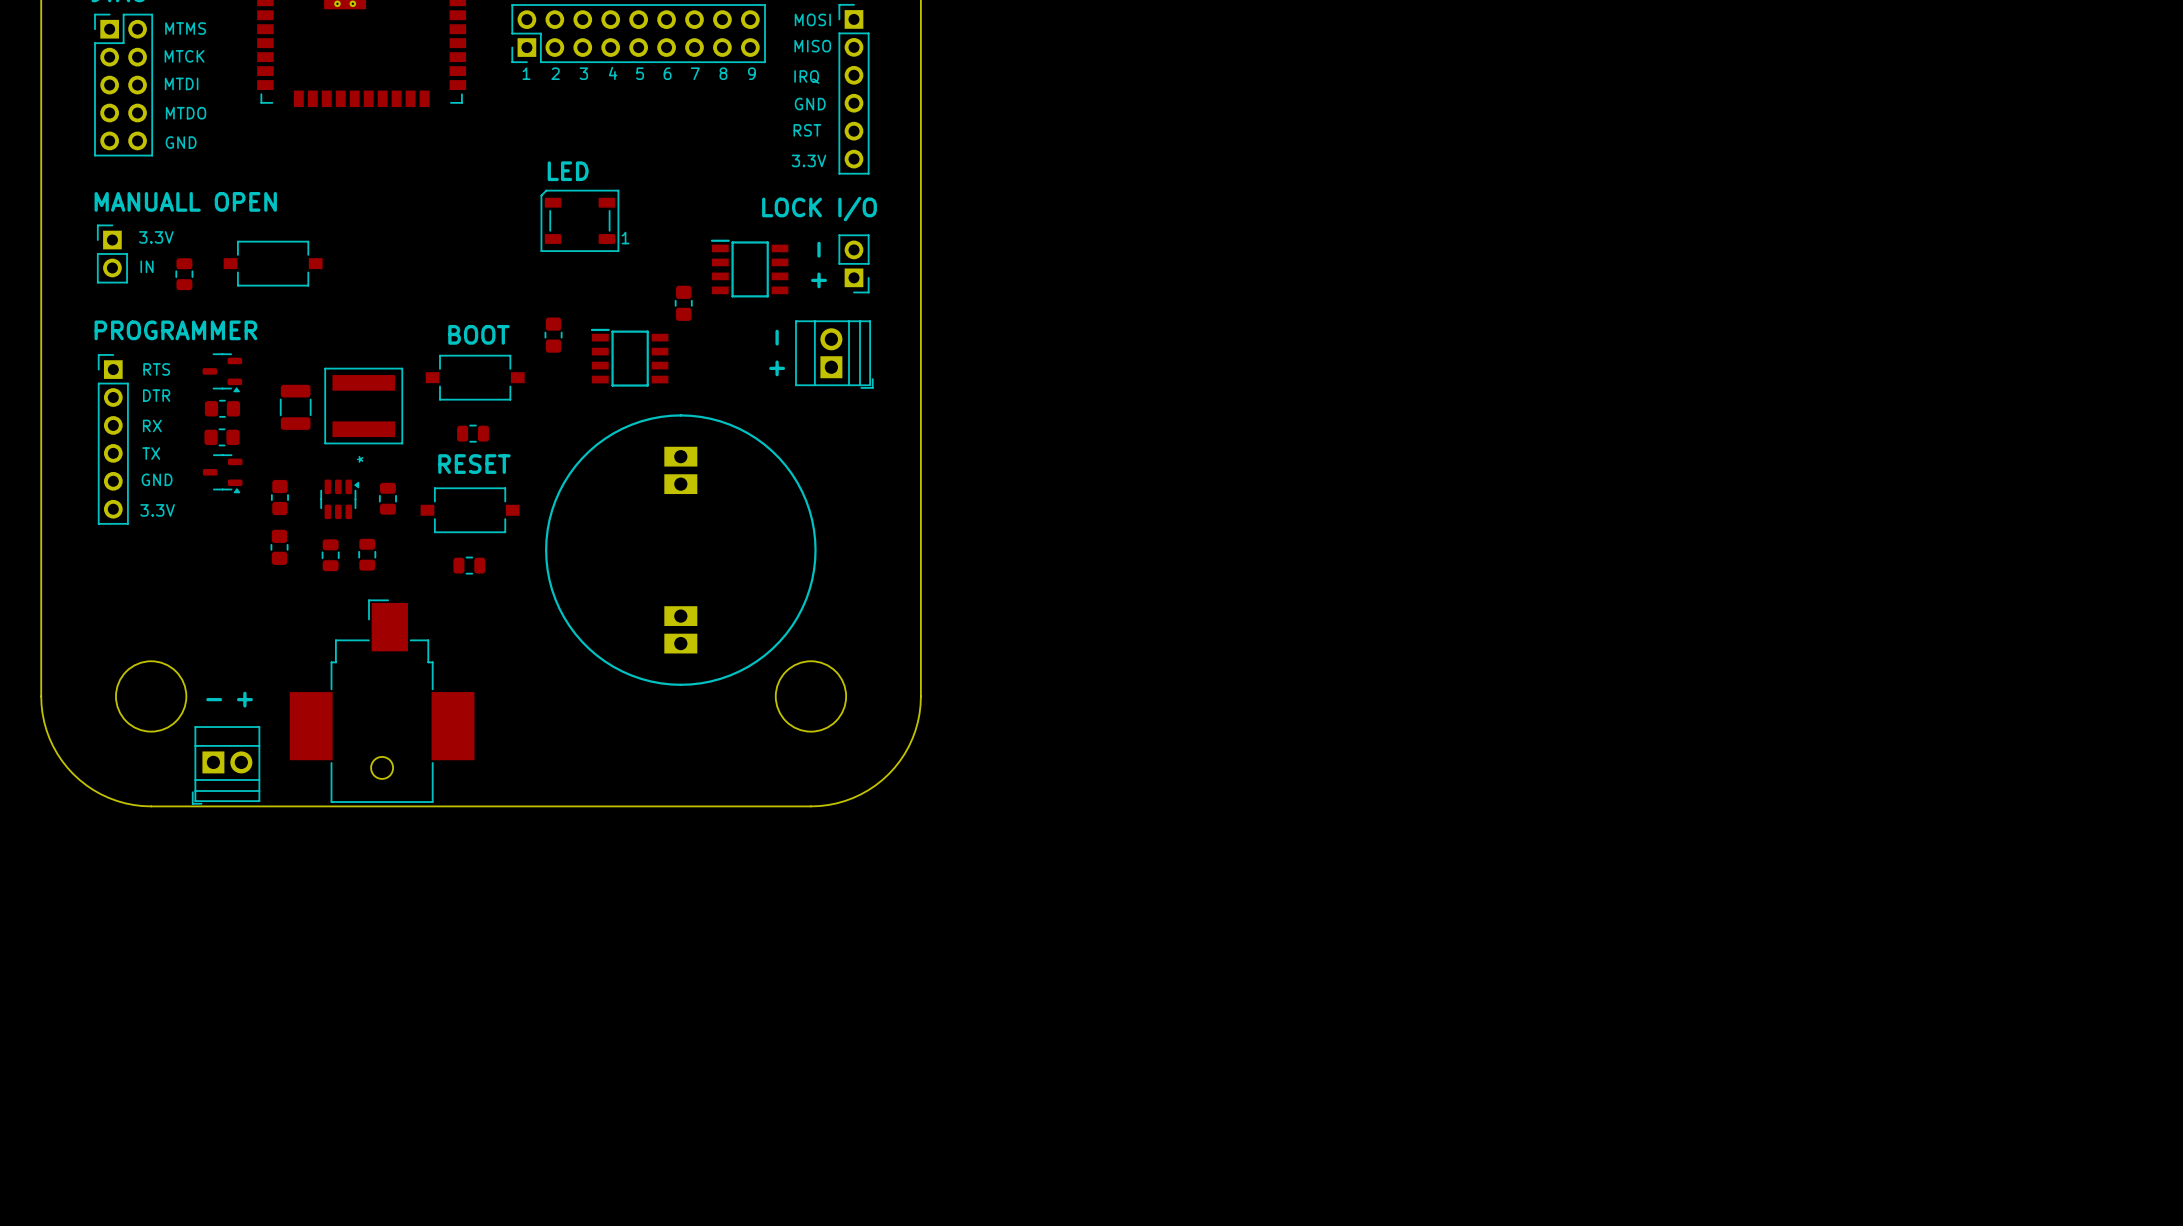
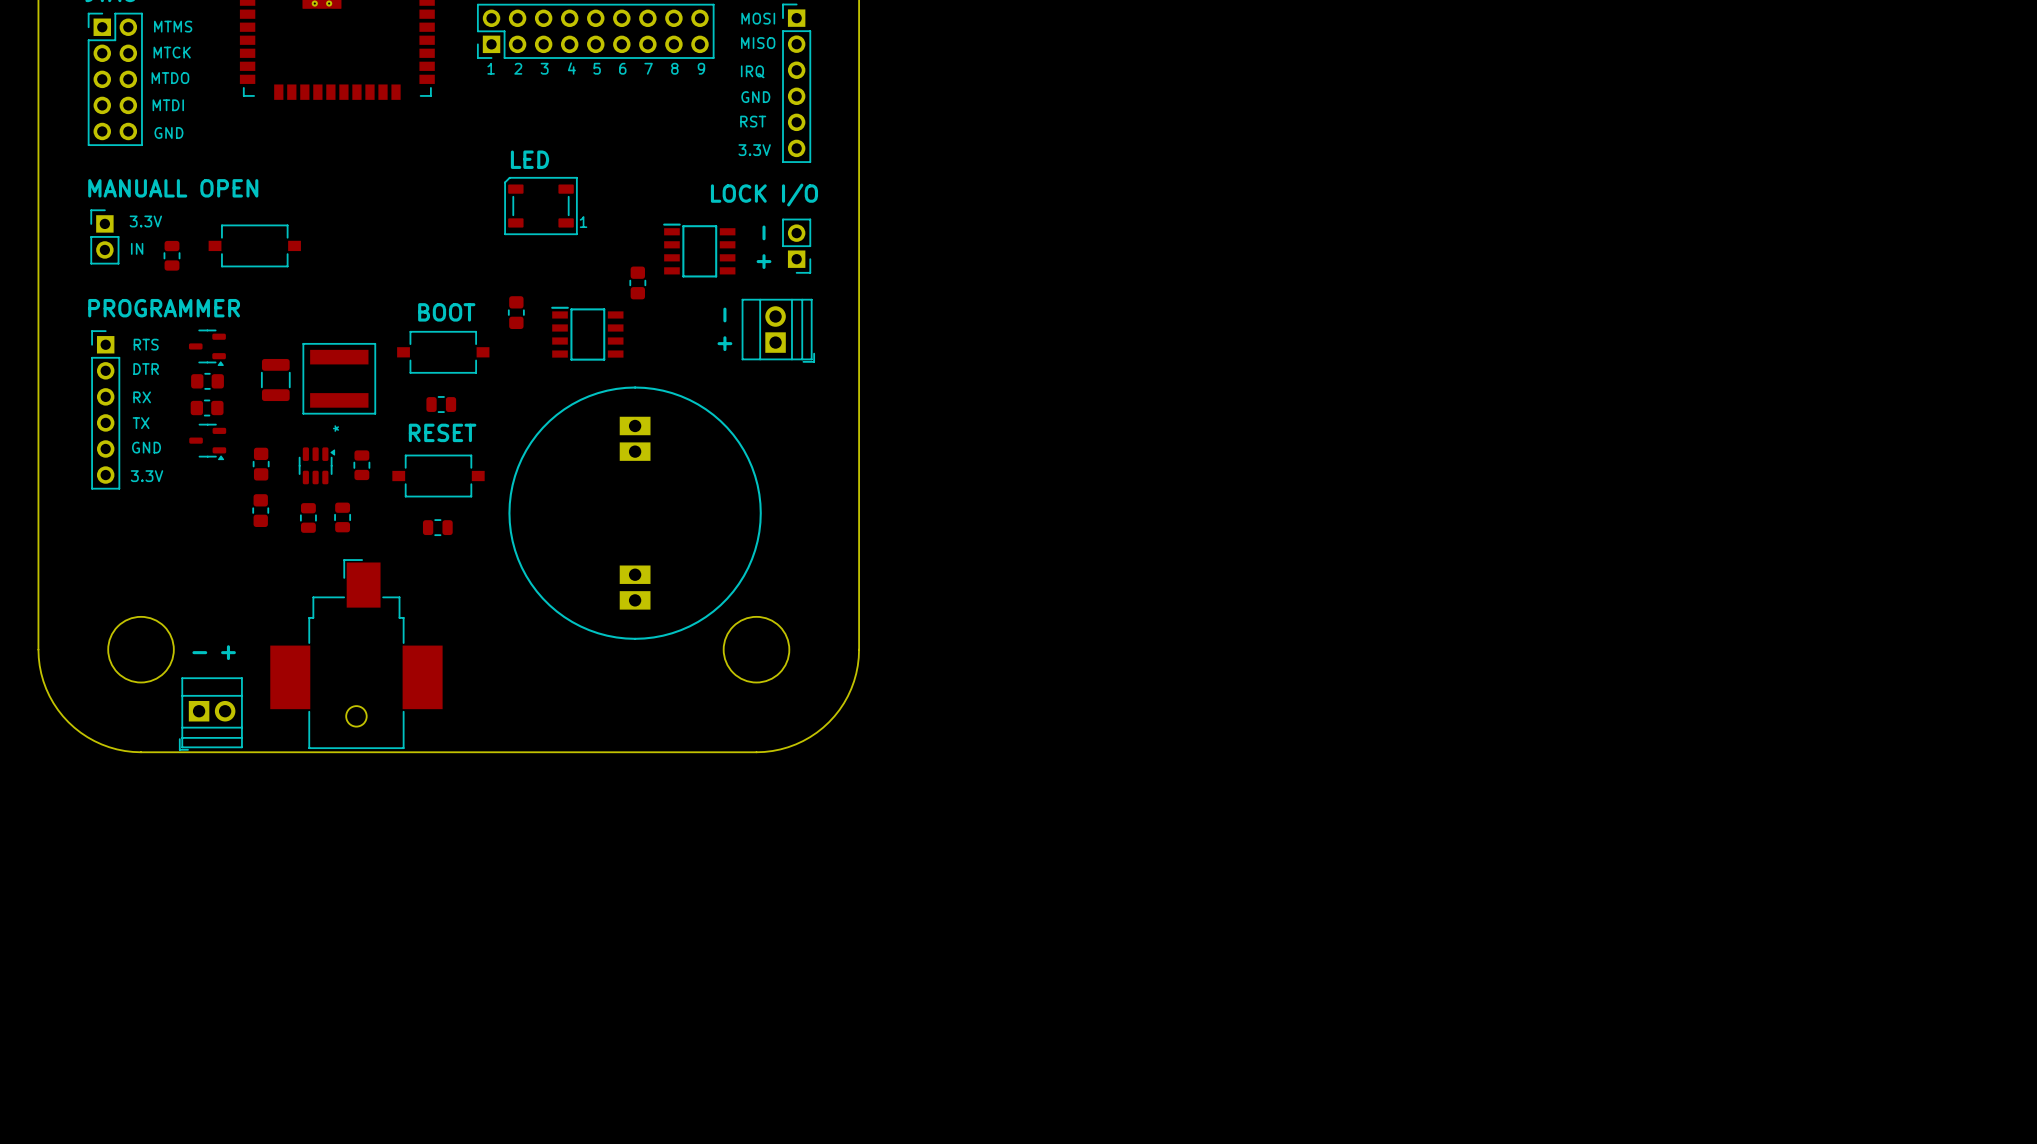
text: MTDI (181, 83) -> MTDO (170, 78)
text: MTDO (186, 113) -> MTDI (168, 105)

